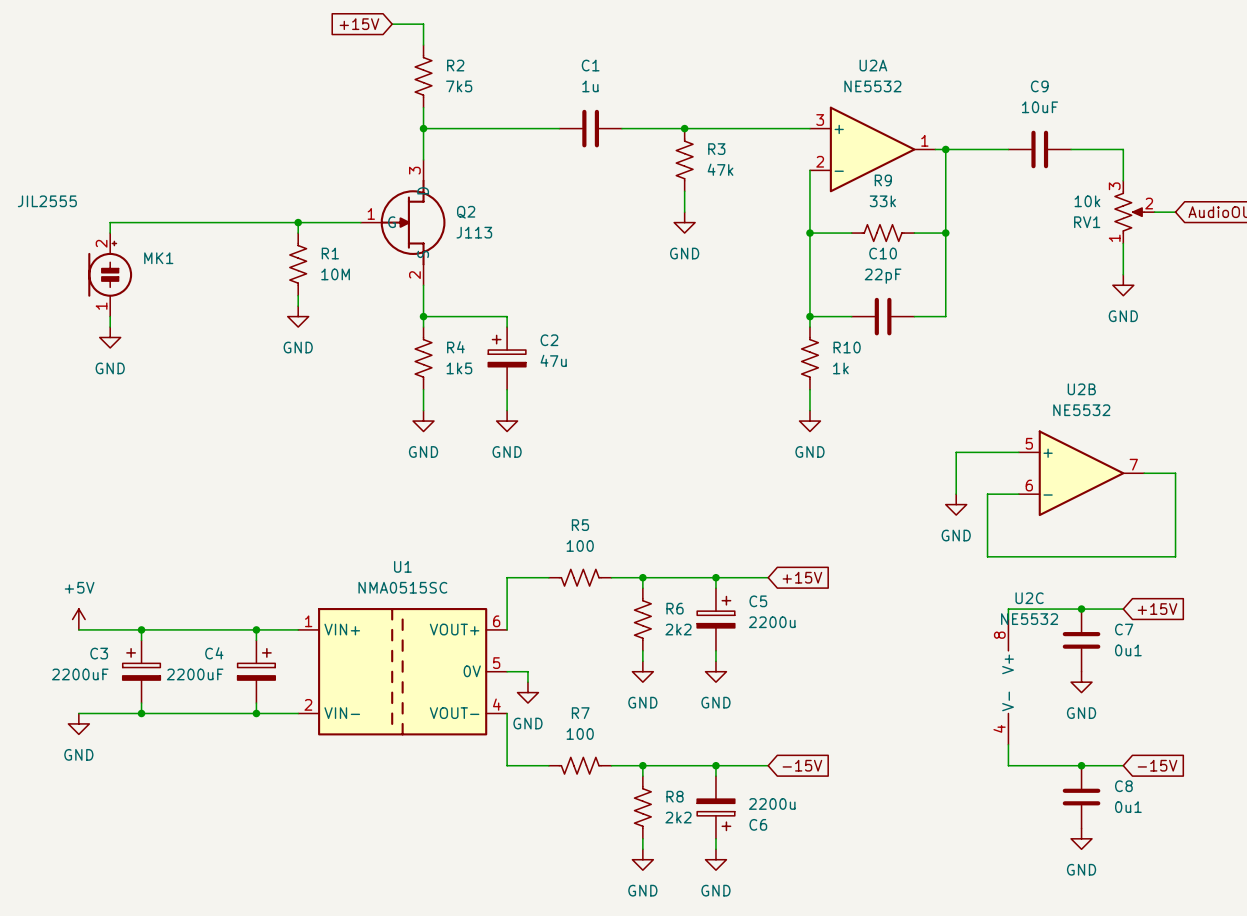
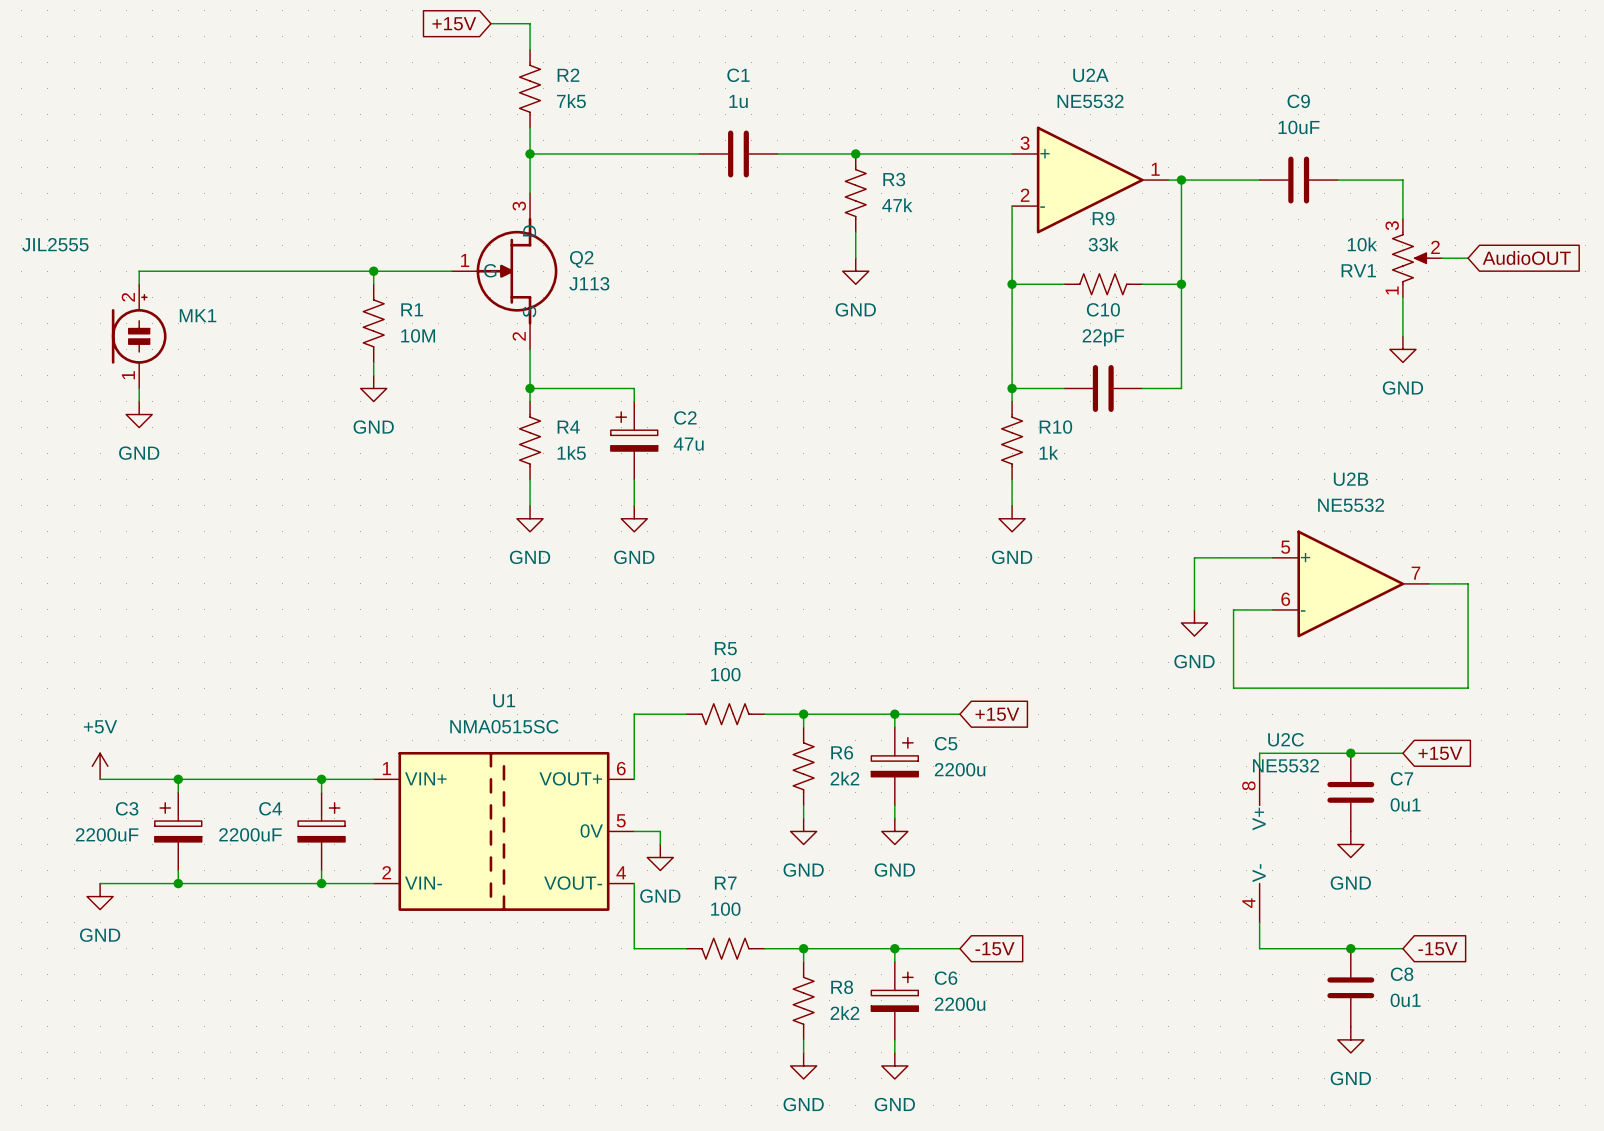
C6 flip: as is (715, 814) -> up-down (894, 991)

